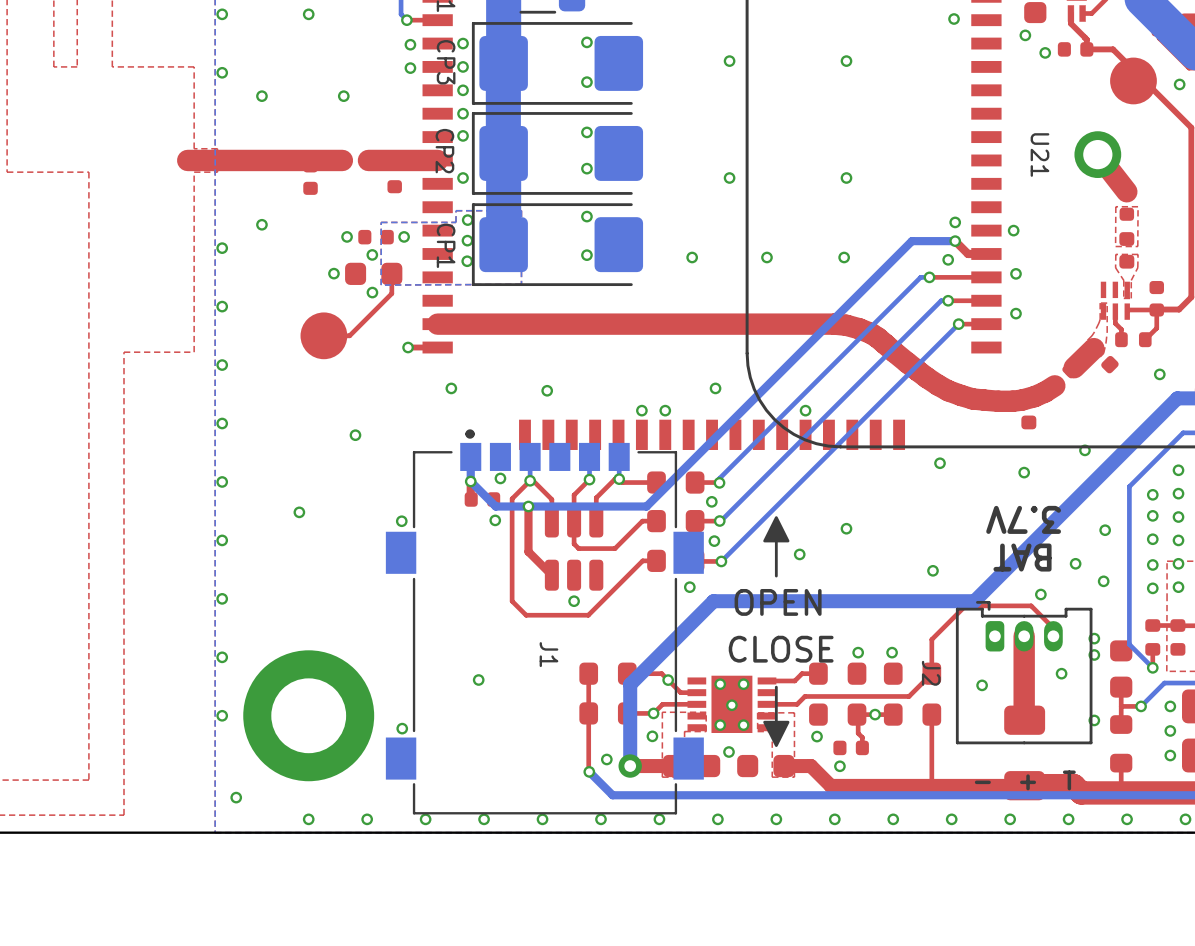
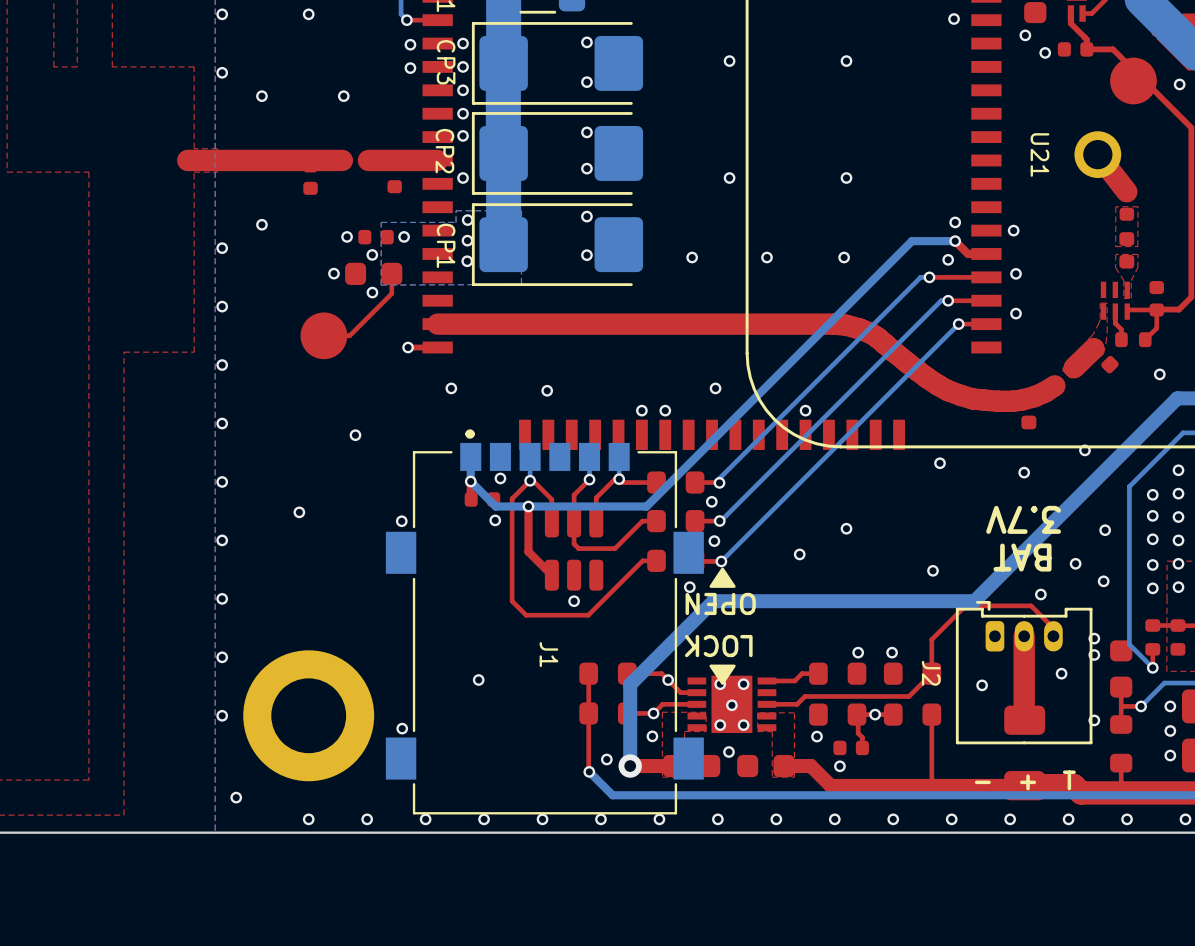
drawing: [763, 516, 790, 747] -> none
drawing: none -> [709, 567, 736, 685]

